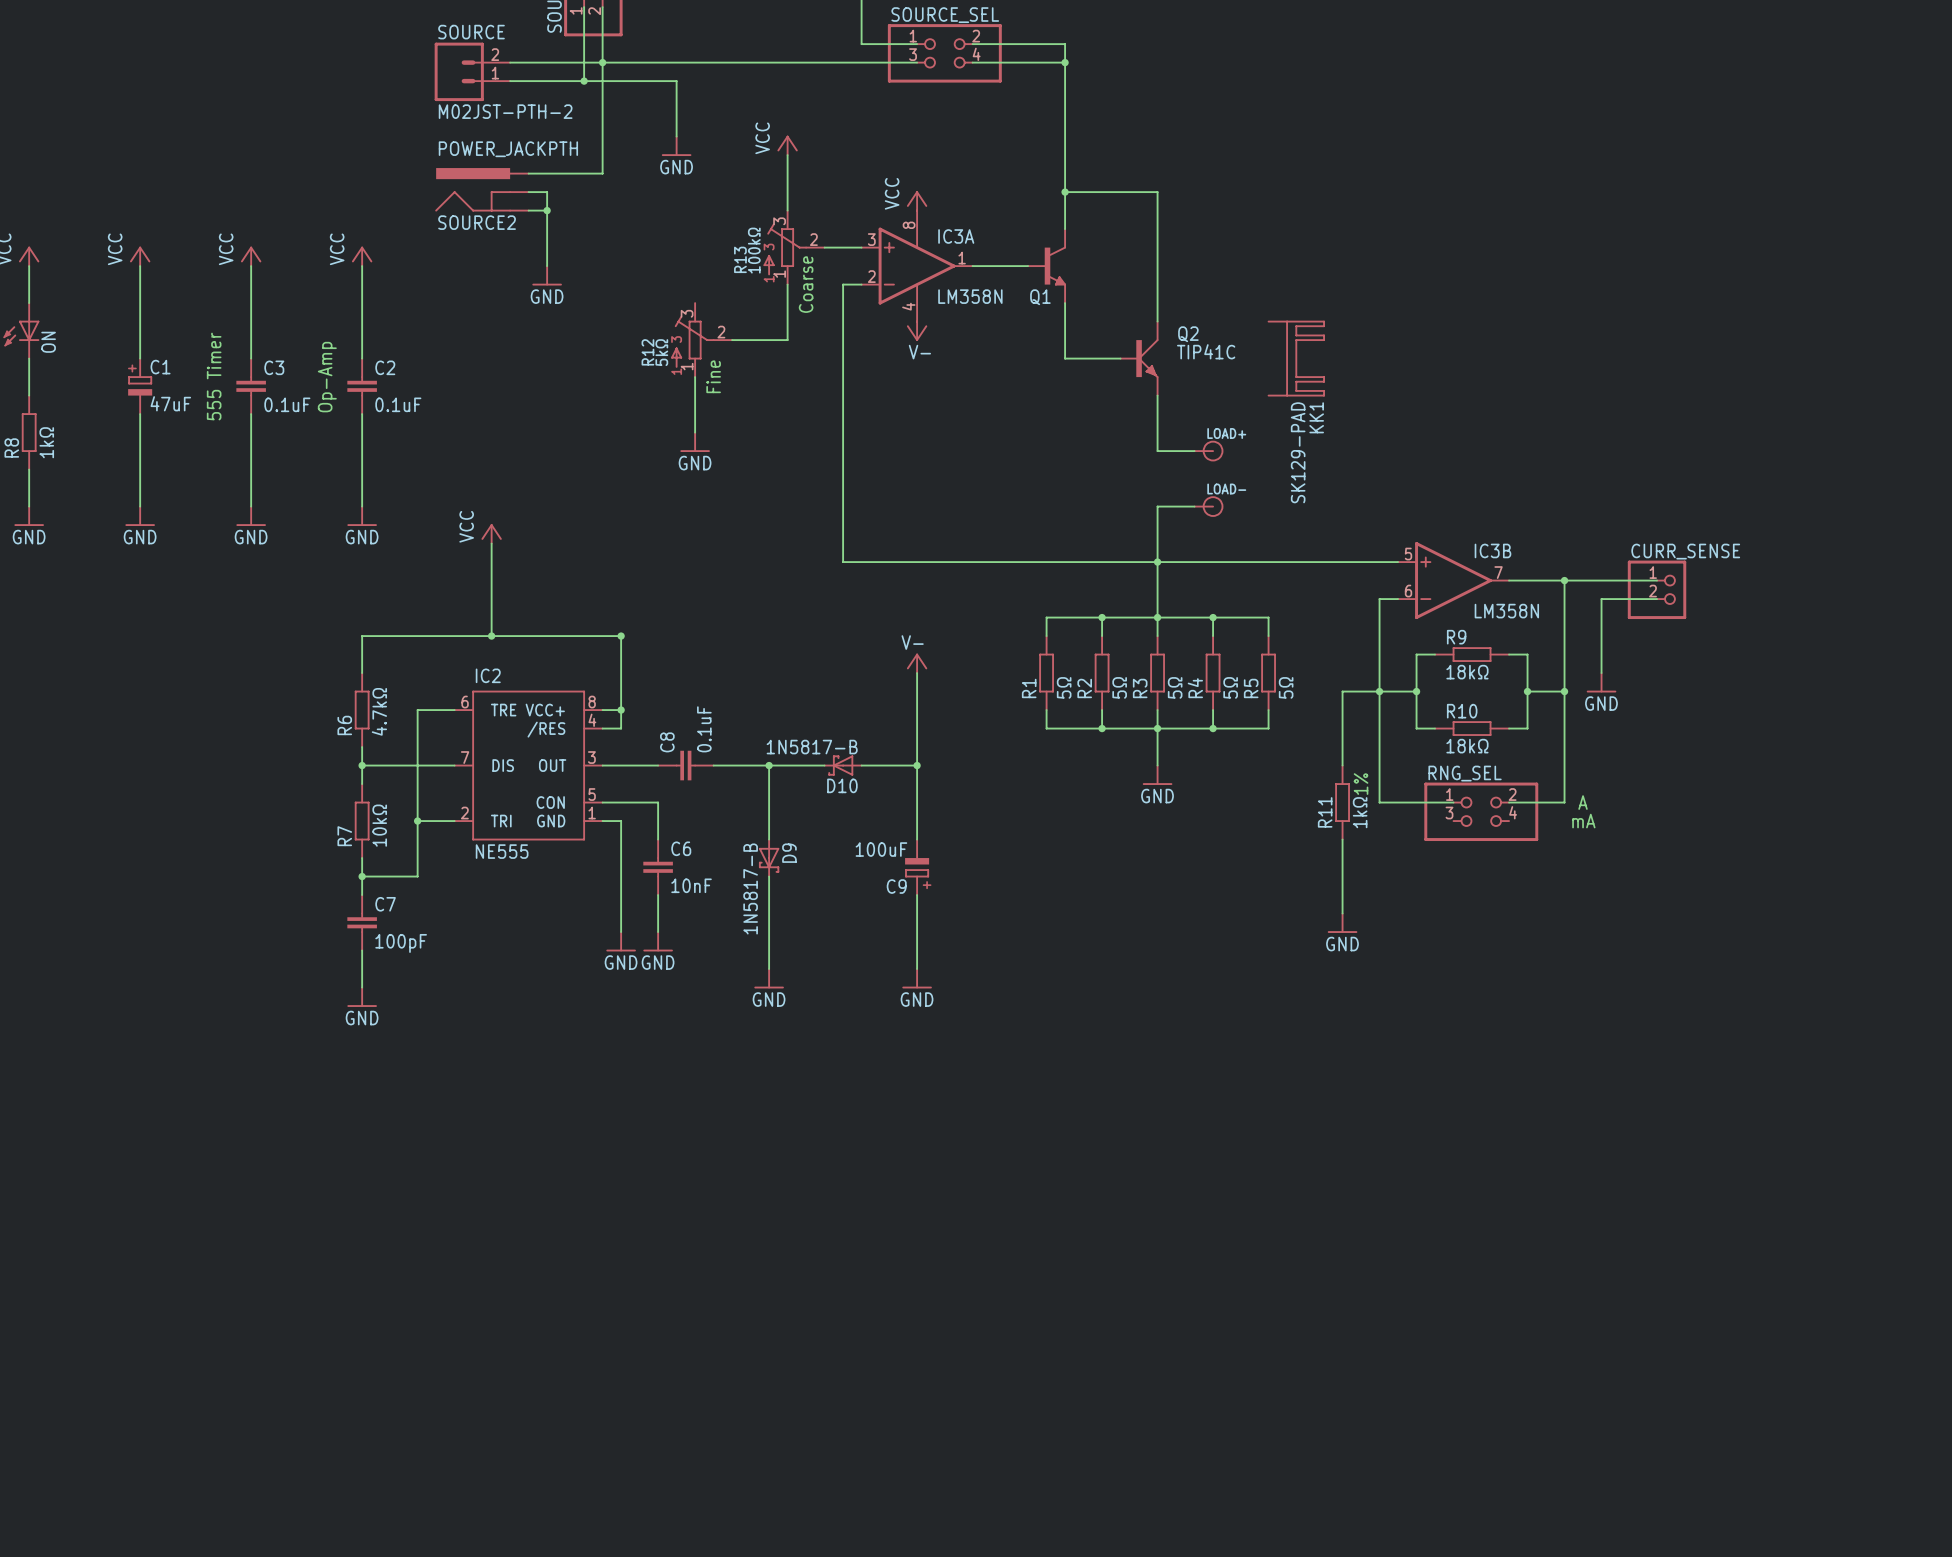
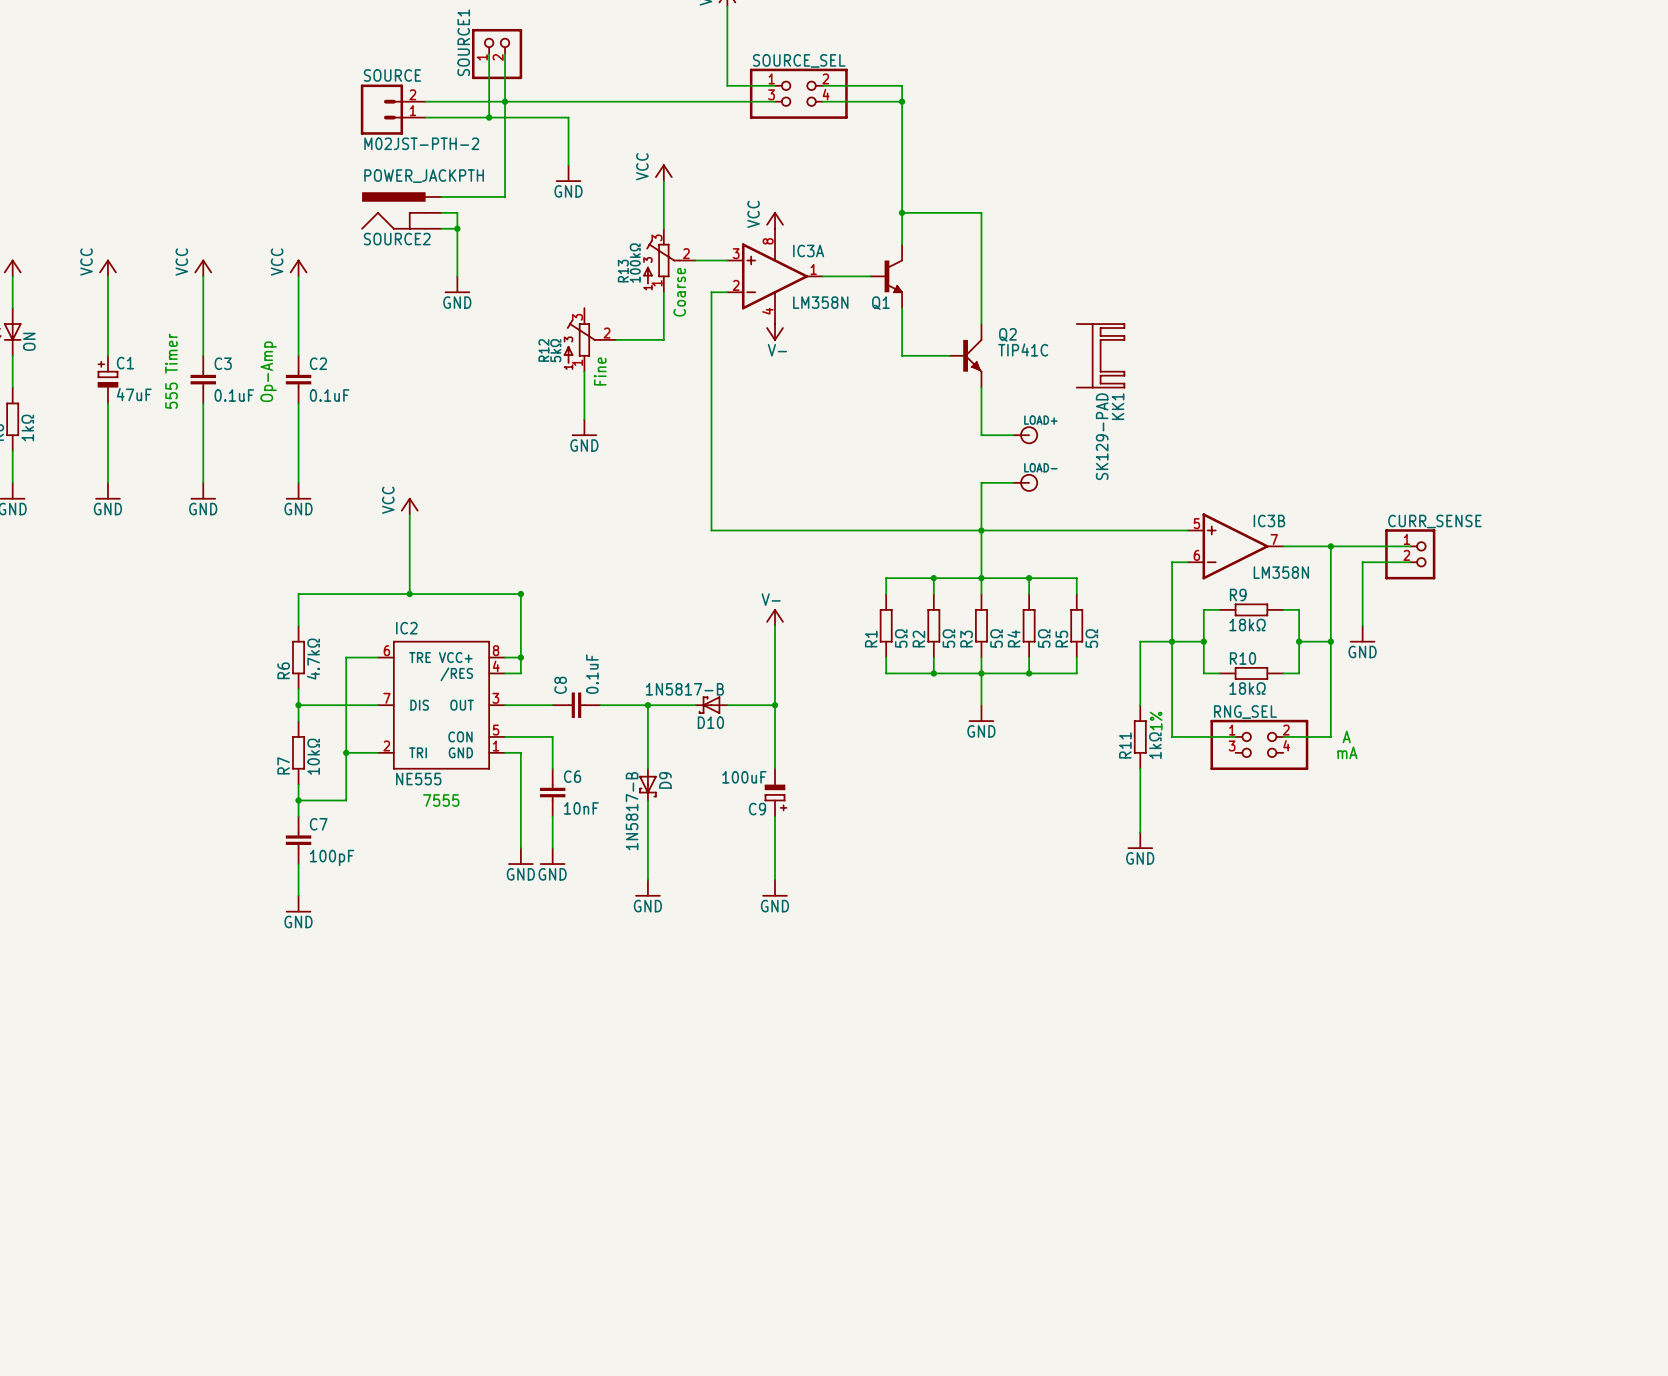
text: none -> 7555 (441, 800)

